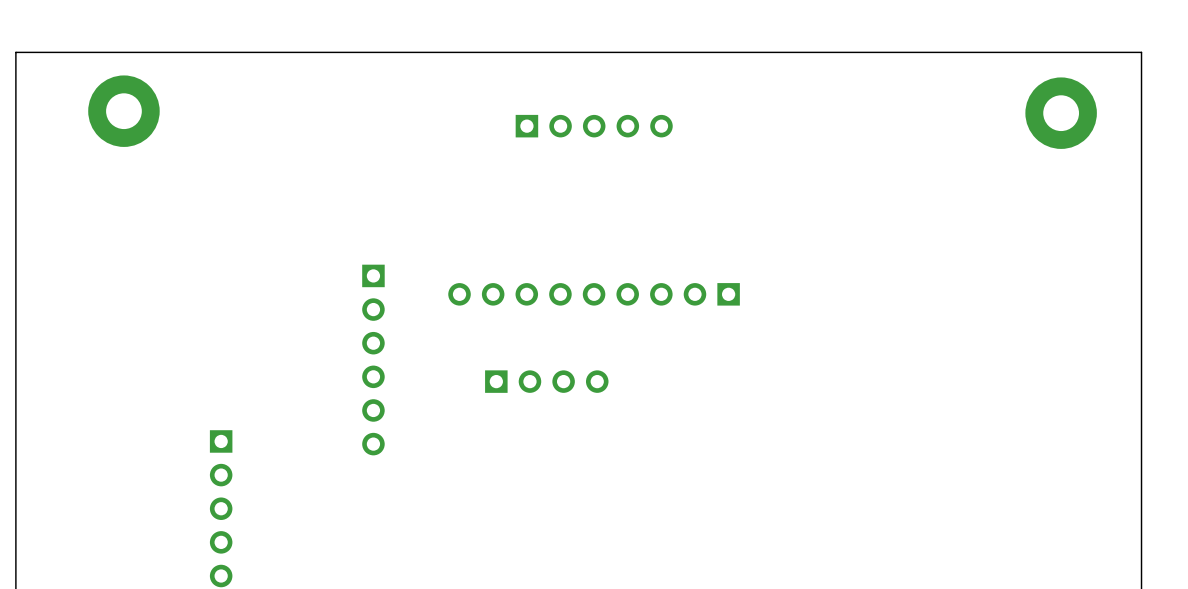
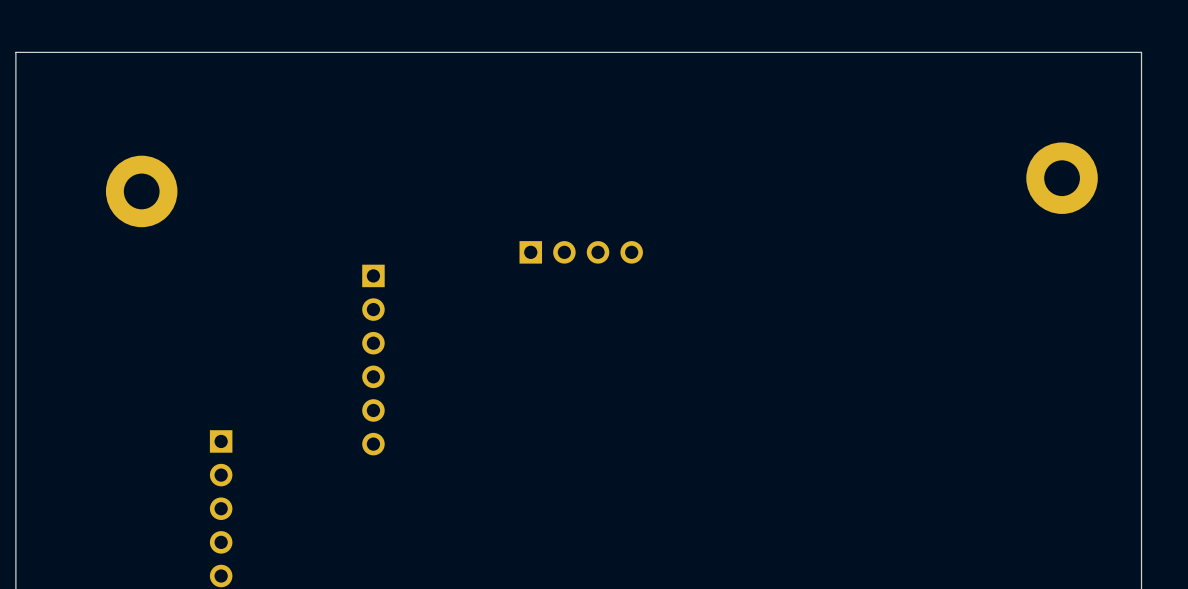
part position: (123, 111) -> (141, 191)
part position: (1061, 113) -> (1062, 178)
part: (594, 126) -> none
part: (594, 294) -> none
part position: (546, 381) -> (581, 252)

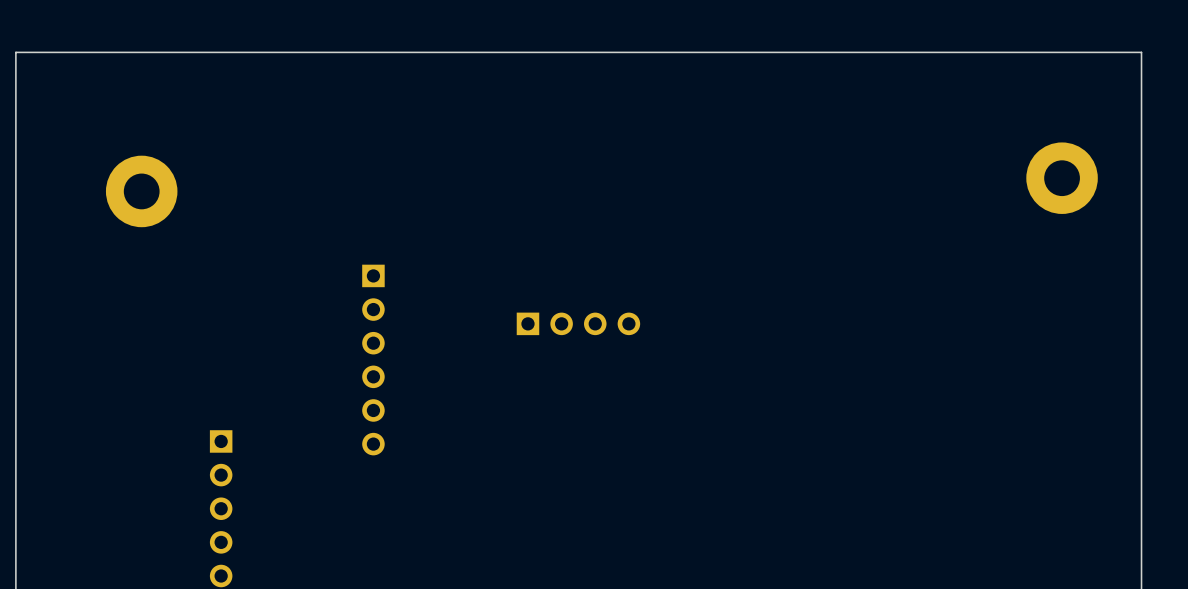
part position: (581, 252) -> (578, 323)

